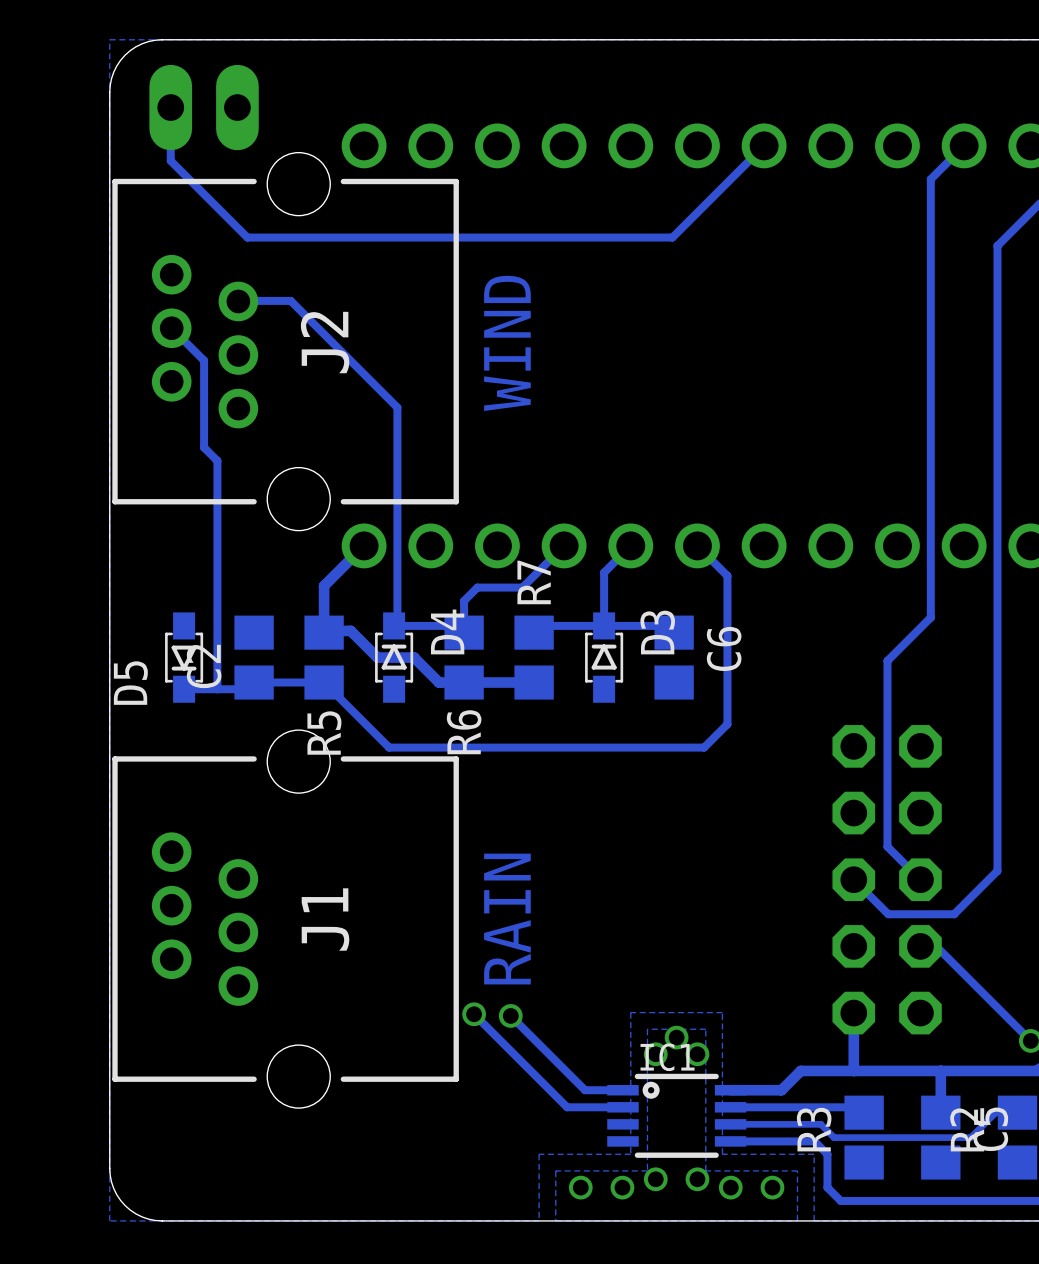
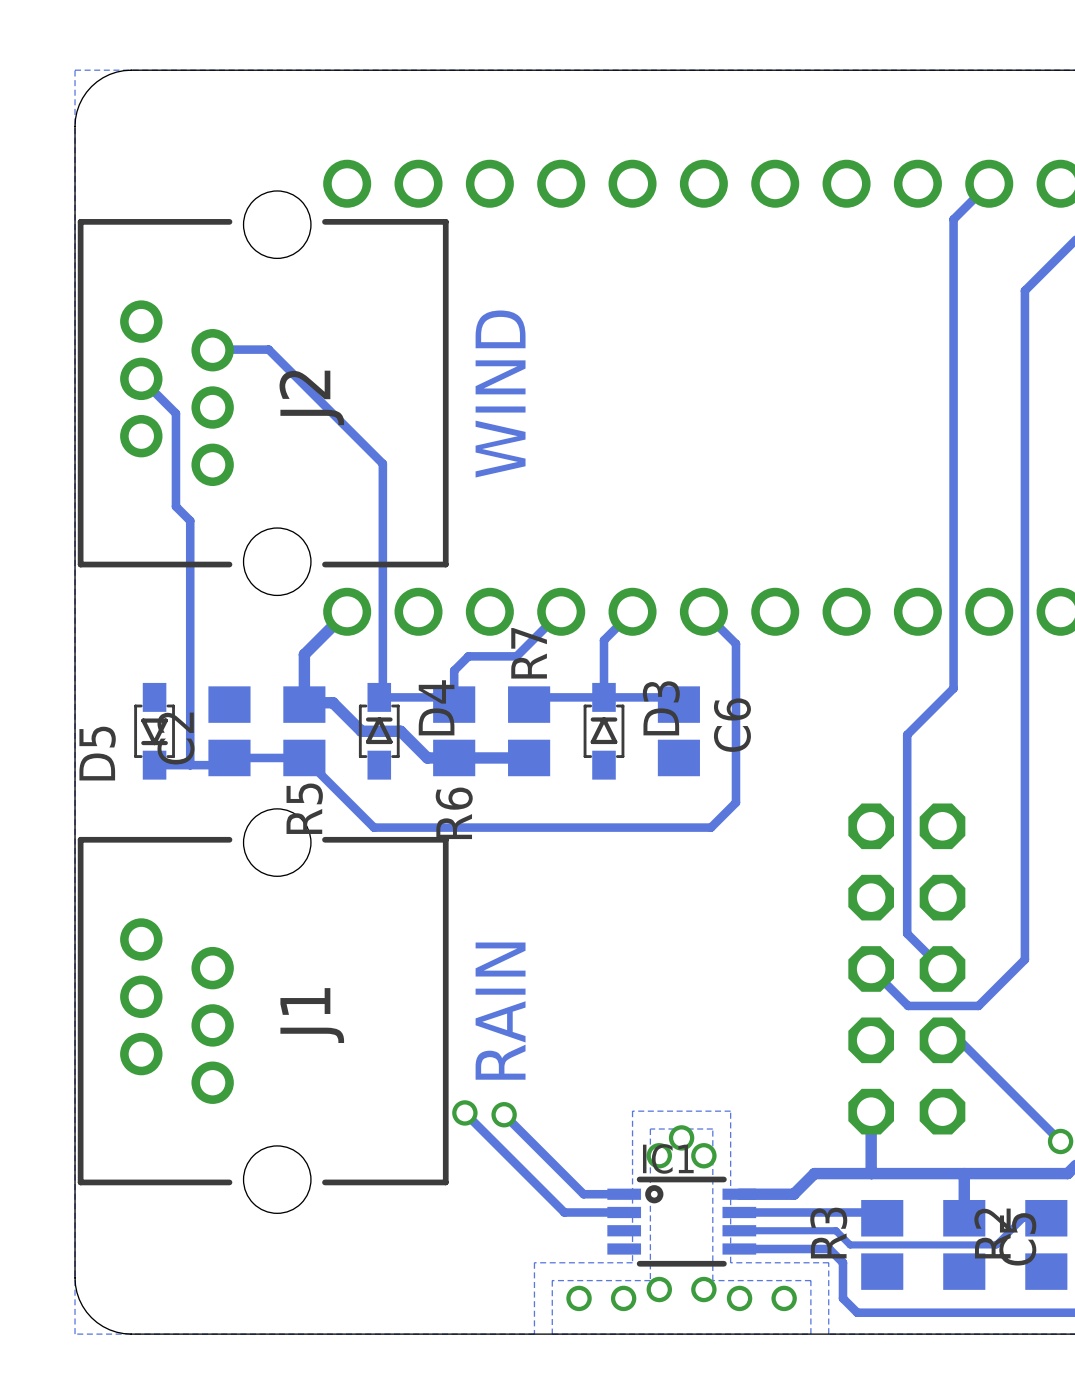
track: (170, 107) (170, 160) (247, 237) (672, 237) (764, 145) -> none
part: (204, 107) -> none

